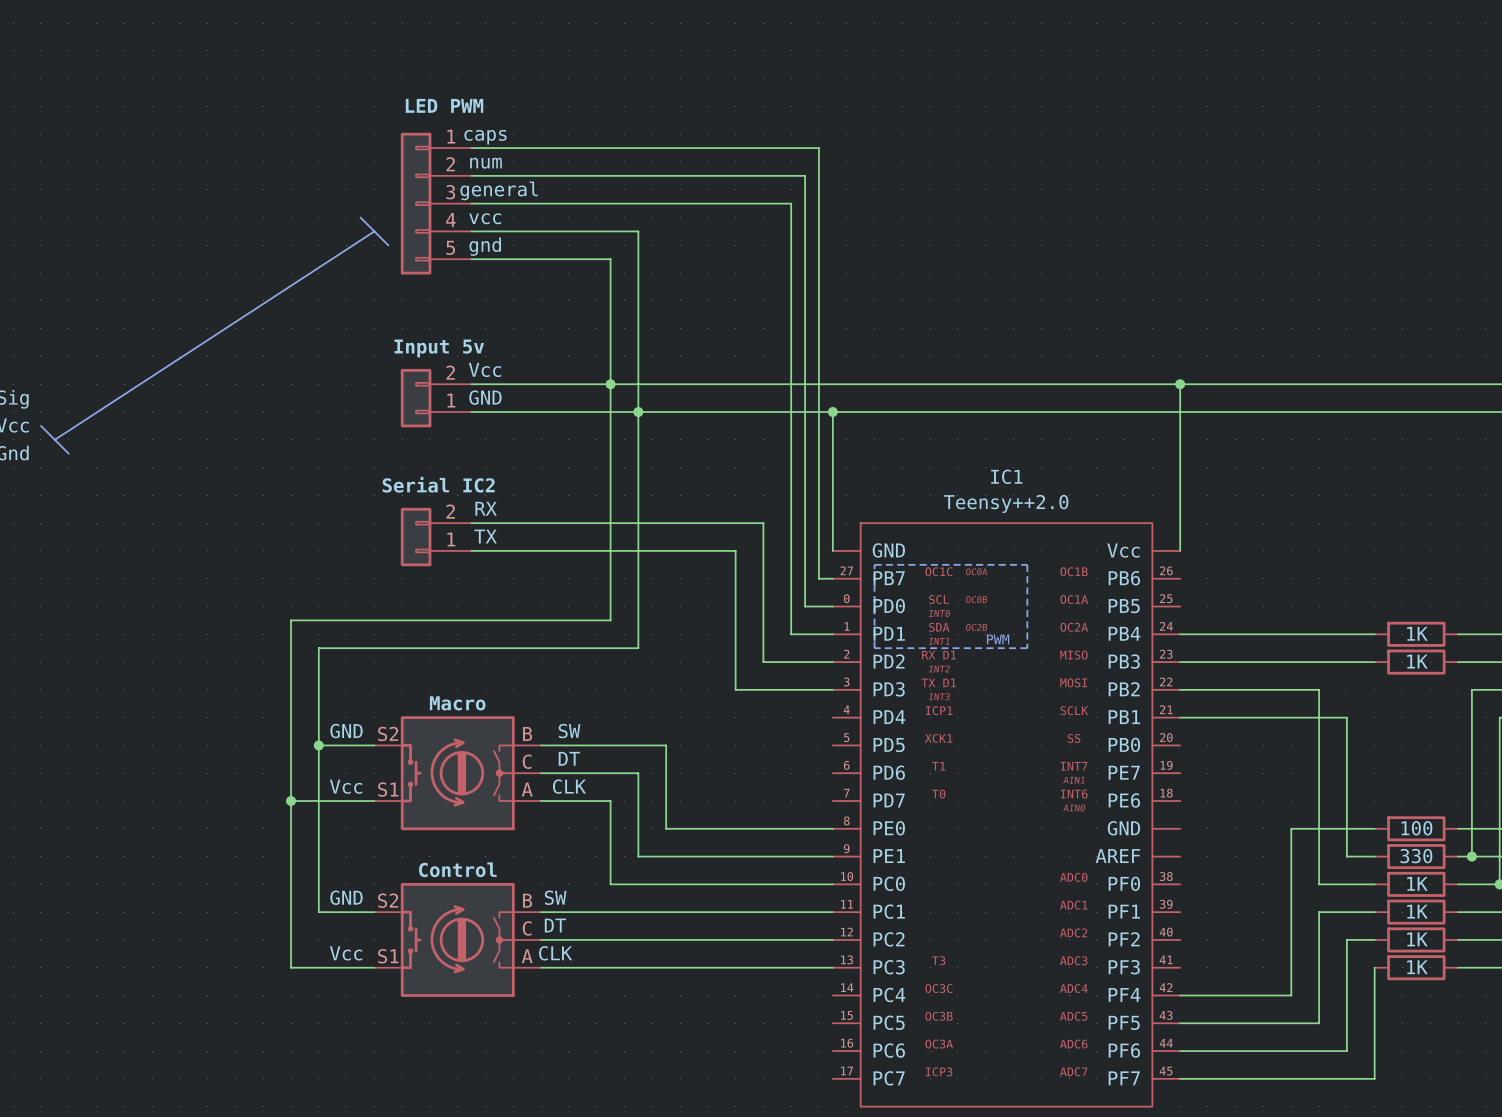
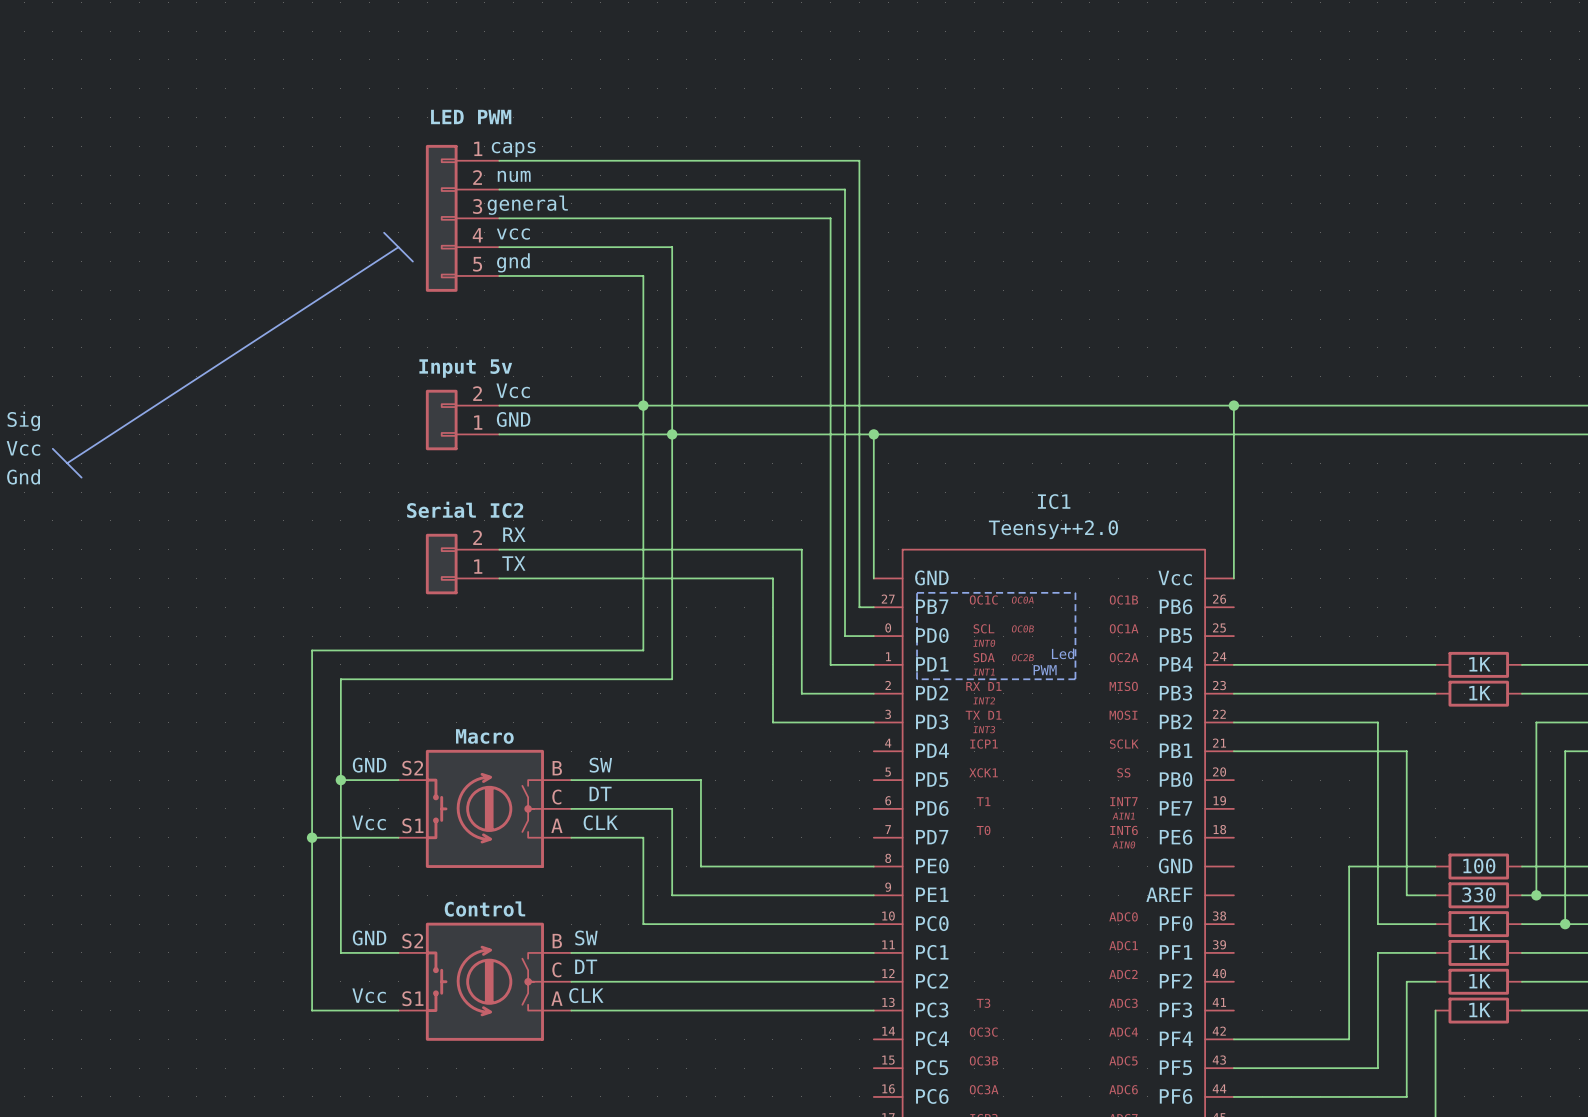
text: none -> Led (1063, 653)

